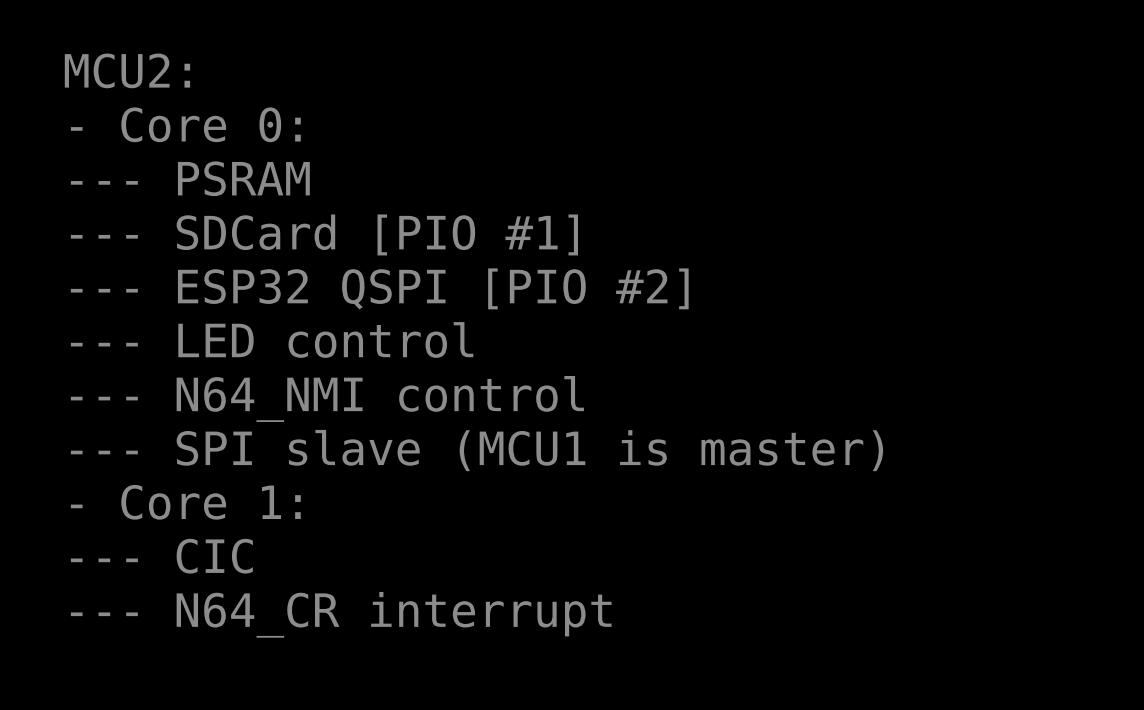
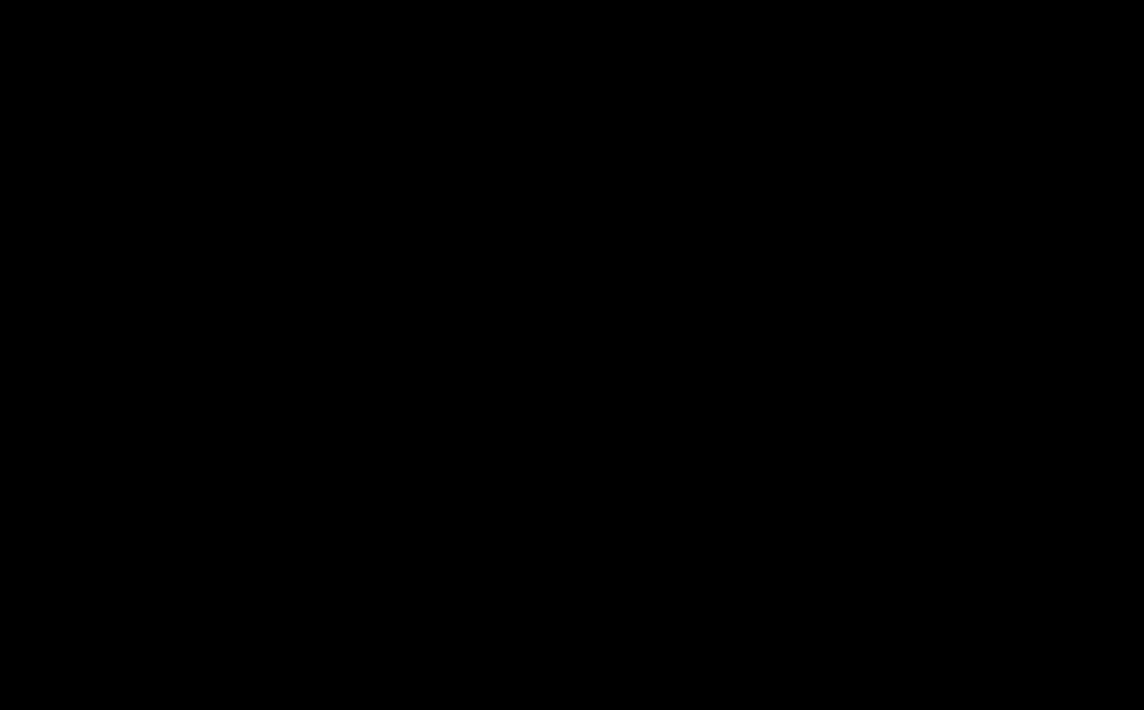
text: MCU2: (127, 70) -> none
text: - Core 0: (185, 124) -> none
text: --- PSRAM (190, 178) -> none
text: --- SDCard [PIO #1] (324, 234) -> none
text: --- ESP32 QSPI [PIO #2] (379, 288) -> none
text: --- LED control (272, 339) -> none
text: --- N64_NMI control (327, 398) -> none
text: --- SPI slave (MCU1 is master) (476, 450) -> none
text: - Core 1: (185, 502) -> none
text: --- CIC (161, 556) -> none
text: --- N64_CR interrupt (341, 614) -> none

